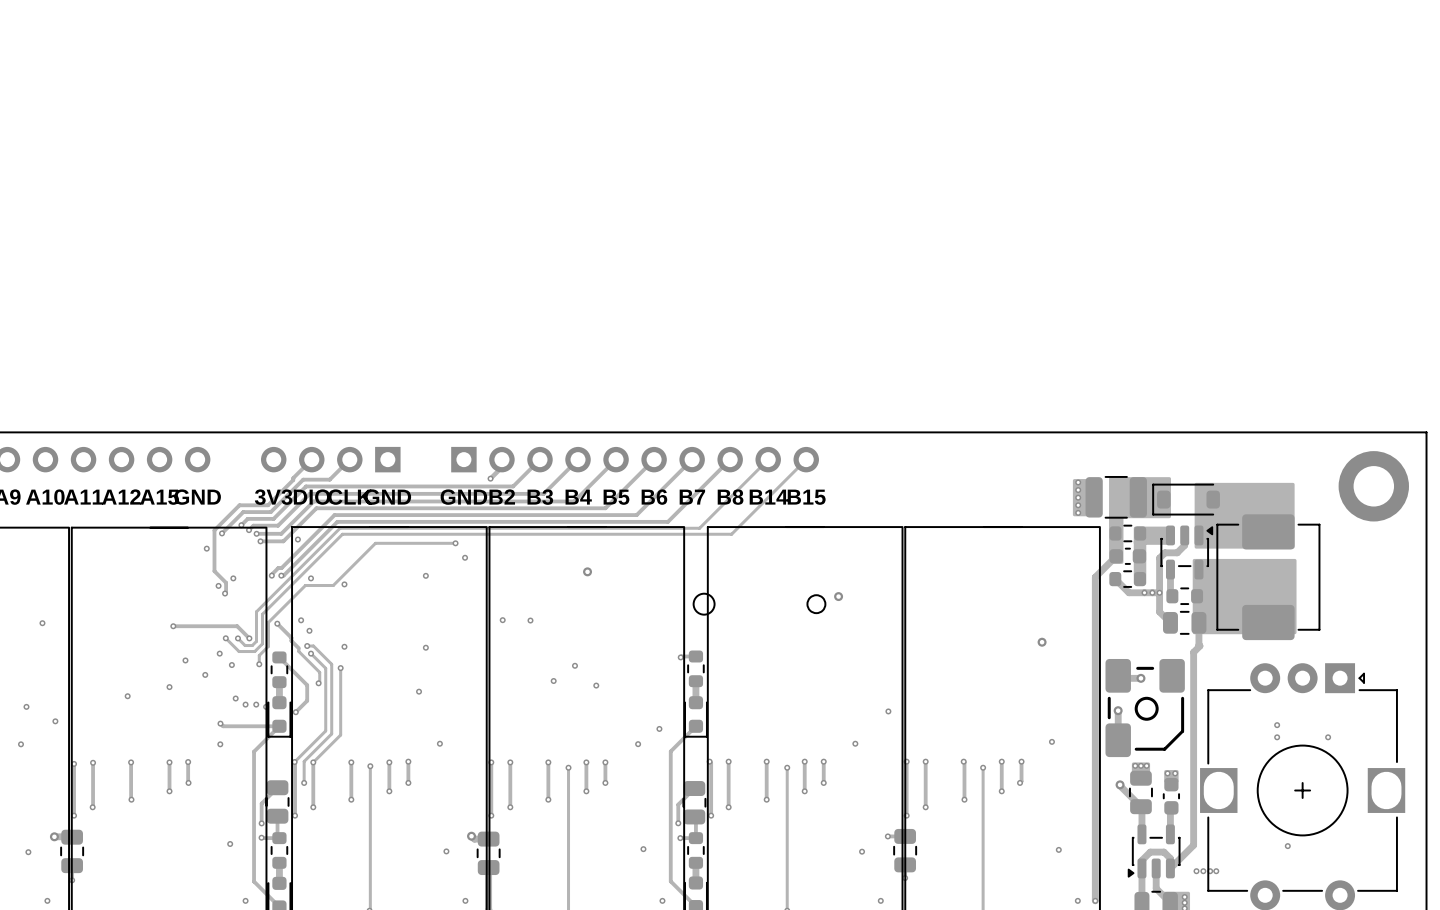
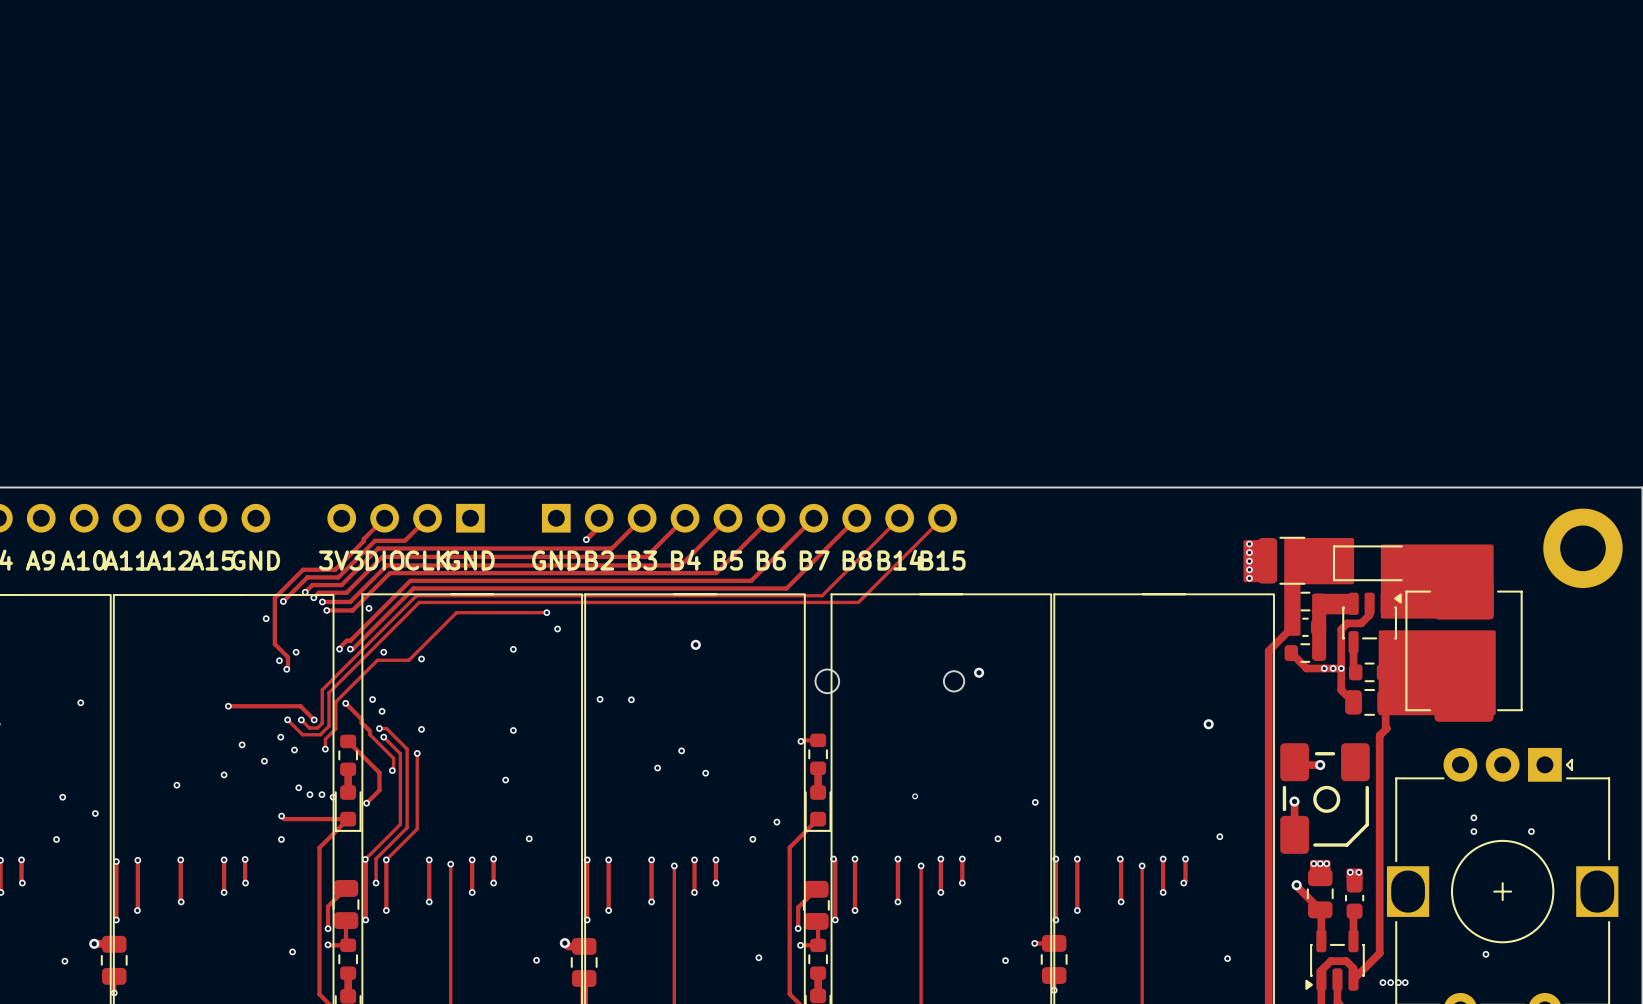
via: none -> (915, 796)

